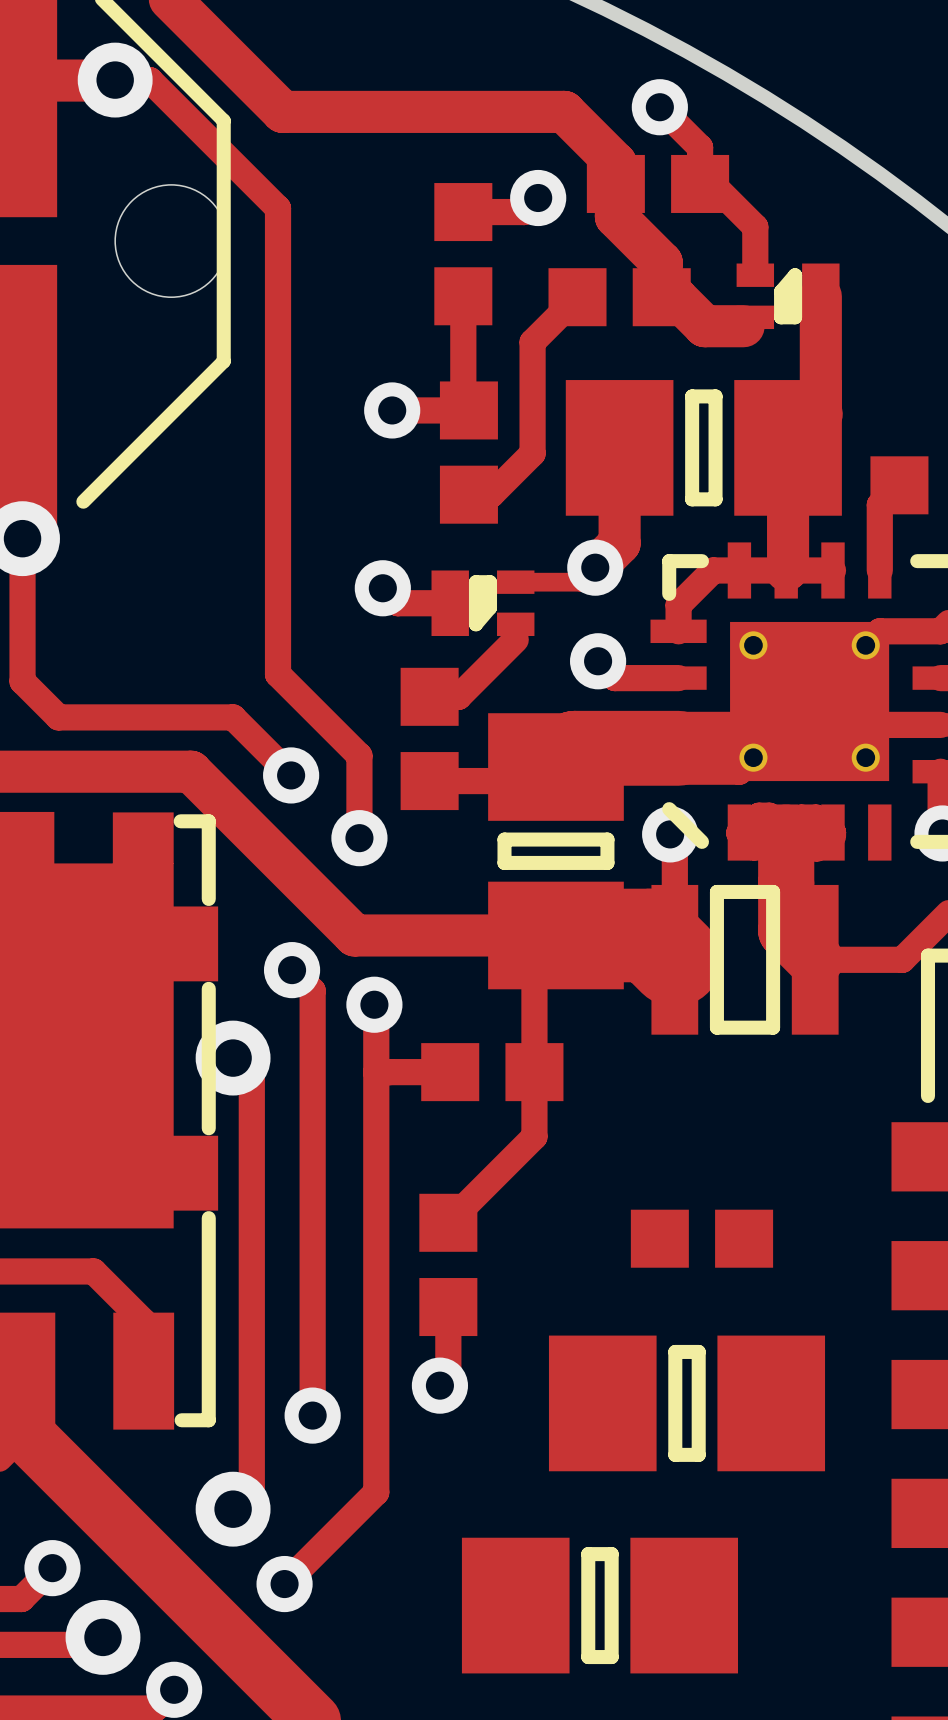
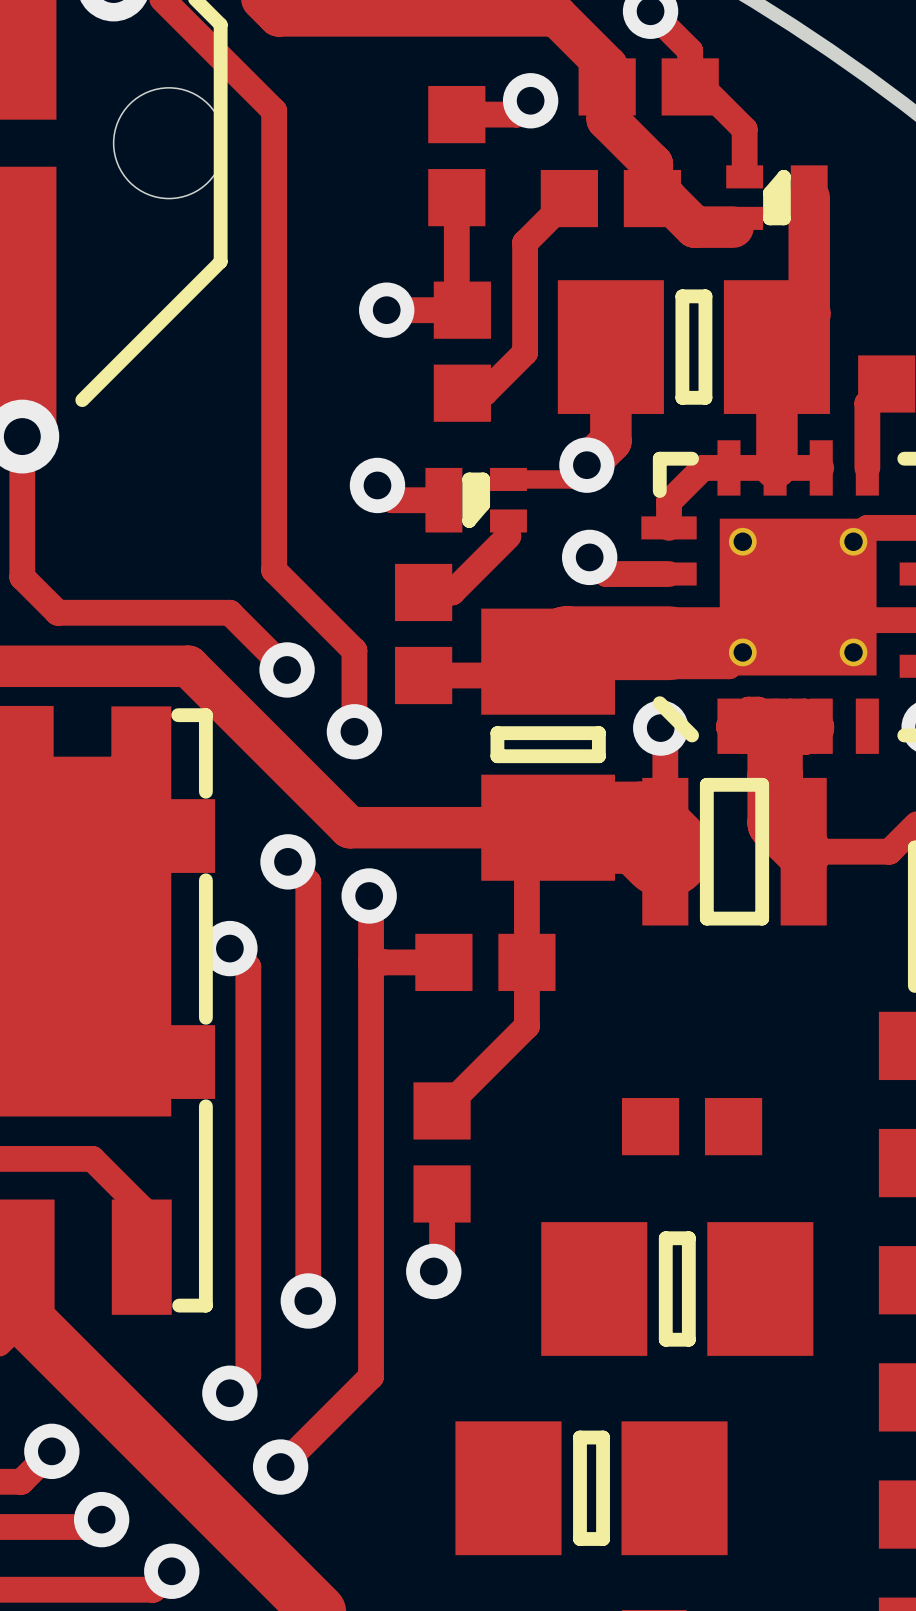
via size: [195, 1020, 271, 1096] -> [202, 920, 258, 977]
via size: [195, 1471, 271, 1547] -> [202, 1365, 258, 1421]
via size: [65, 1599, 141, 1675] -> [73, 1491, 130, 1548]

